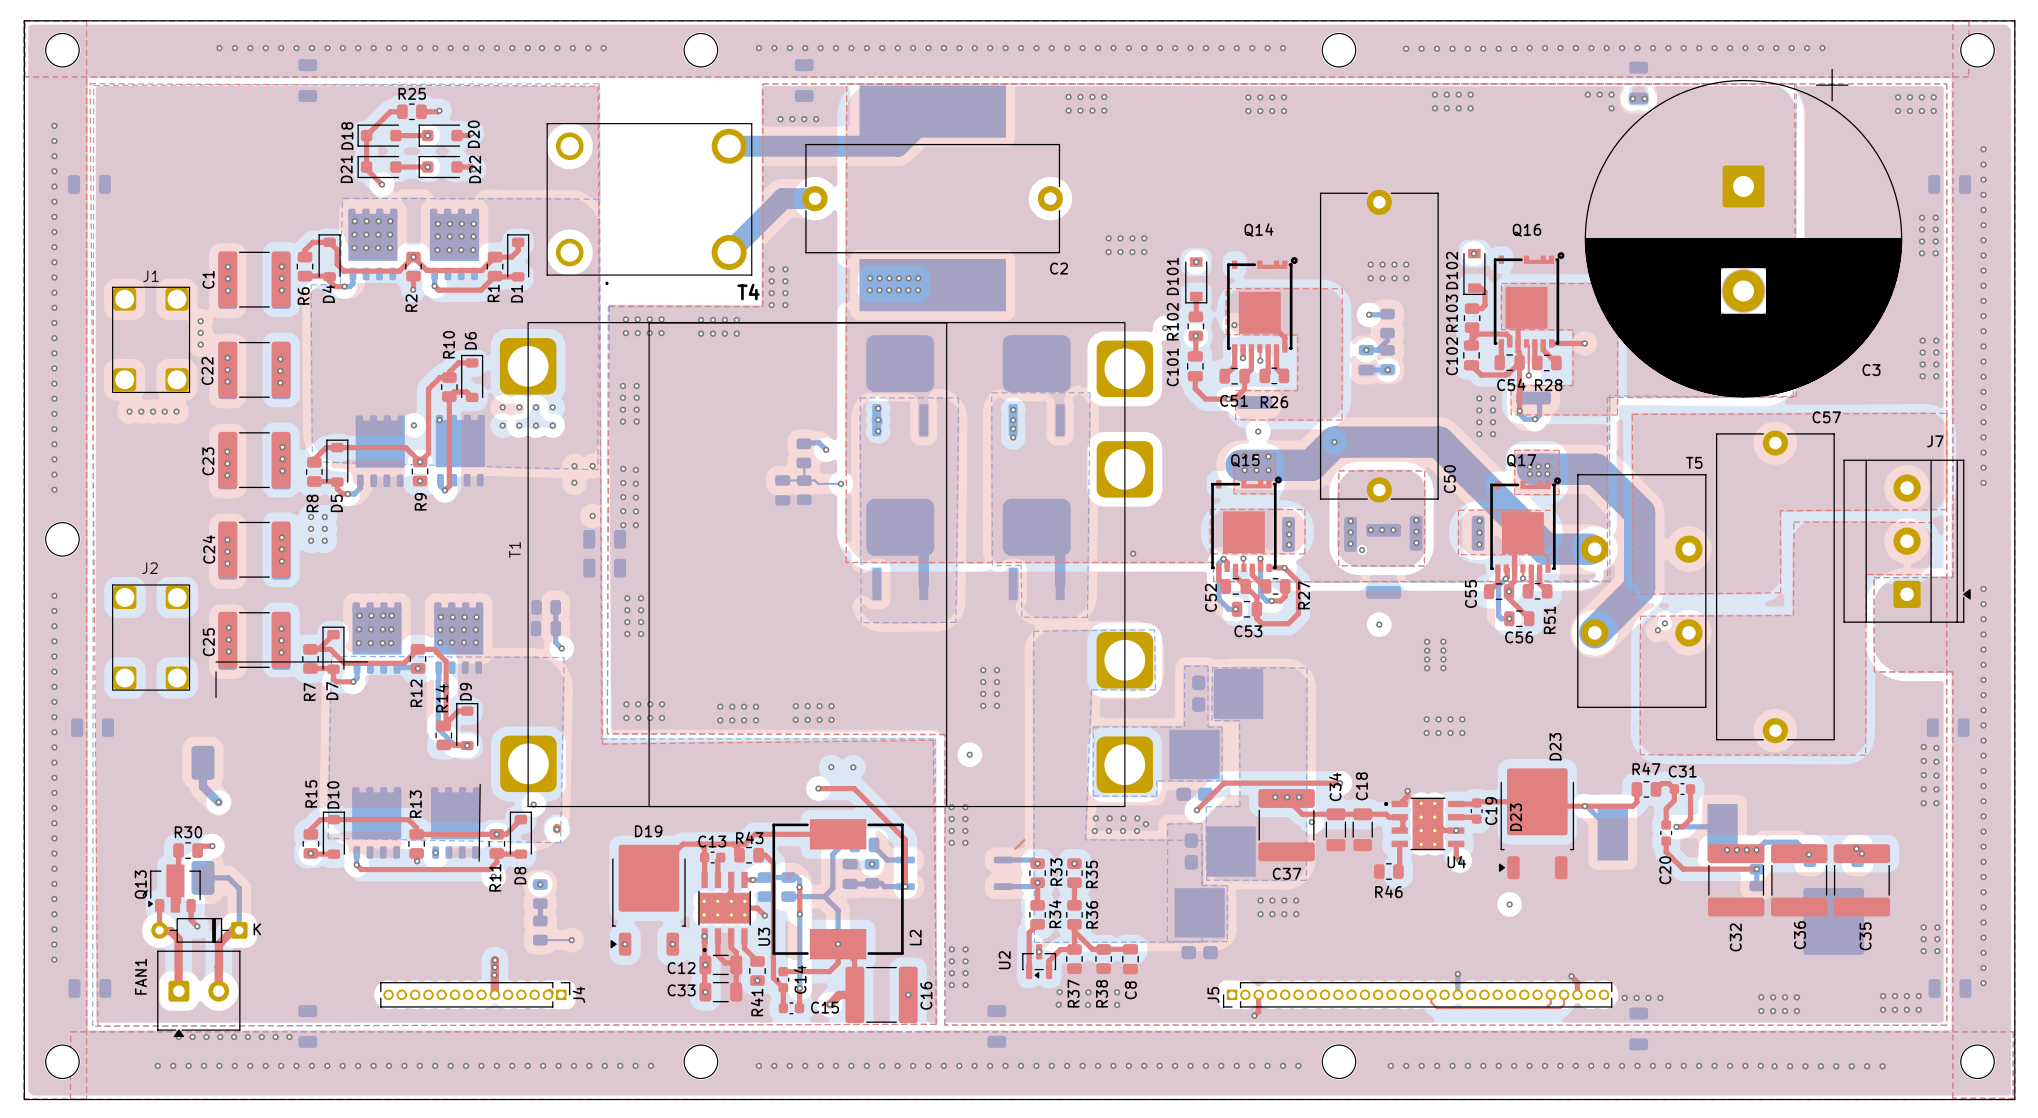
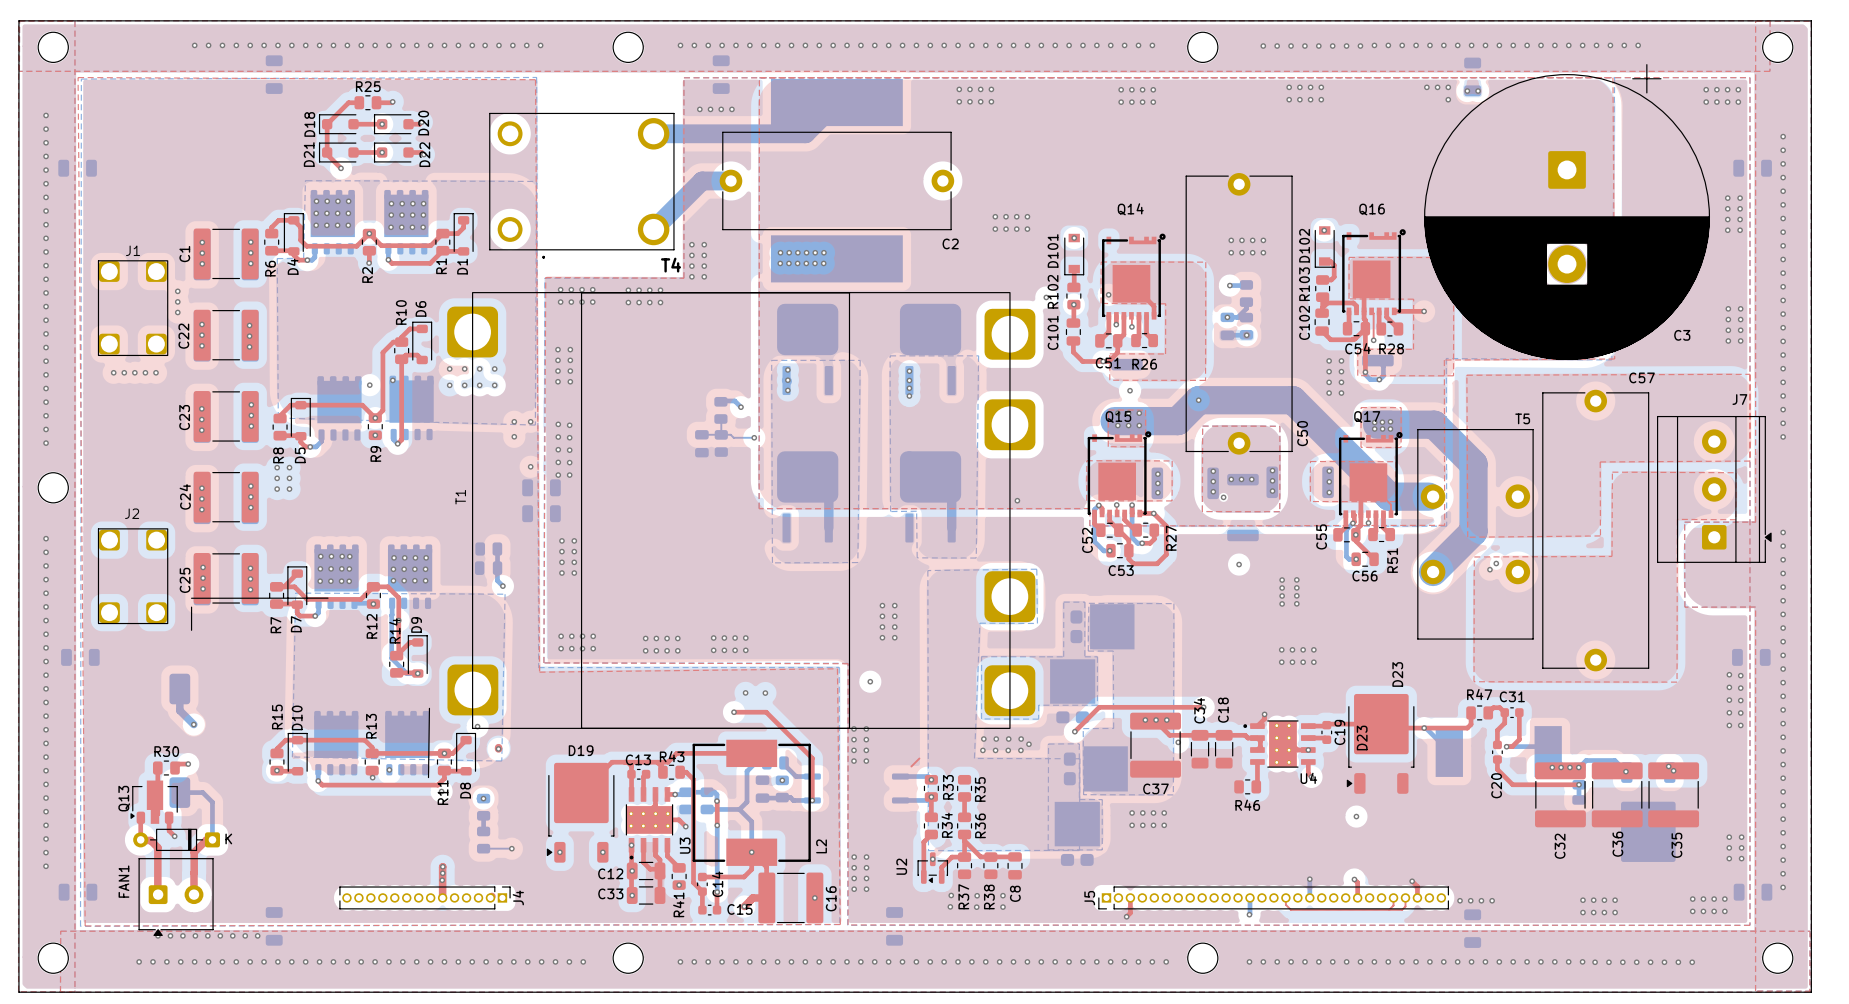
via: (1074, 863) -> none
top track: none -> (1354, 879) (1357, 882) (1357, 897)
via: none -> (1354, 879)
bottom track: none -> (1250, 897) (1249, 914)
via: none -> (1249, 914)

